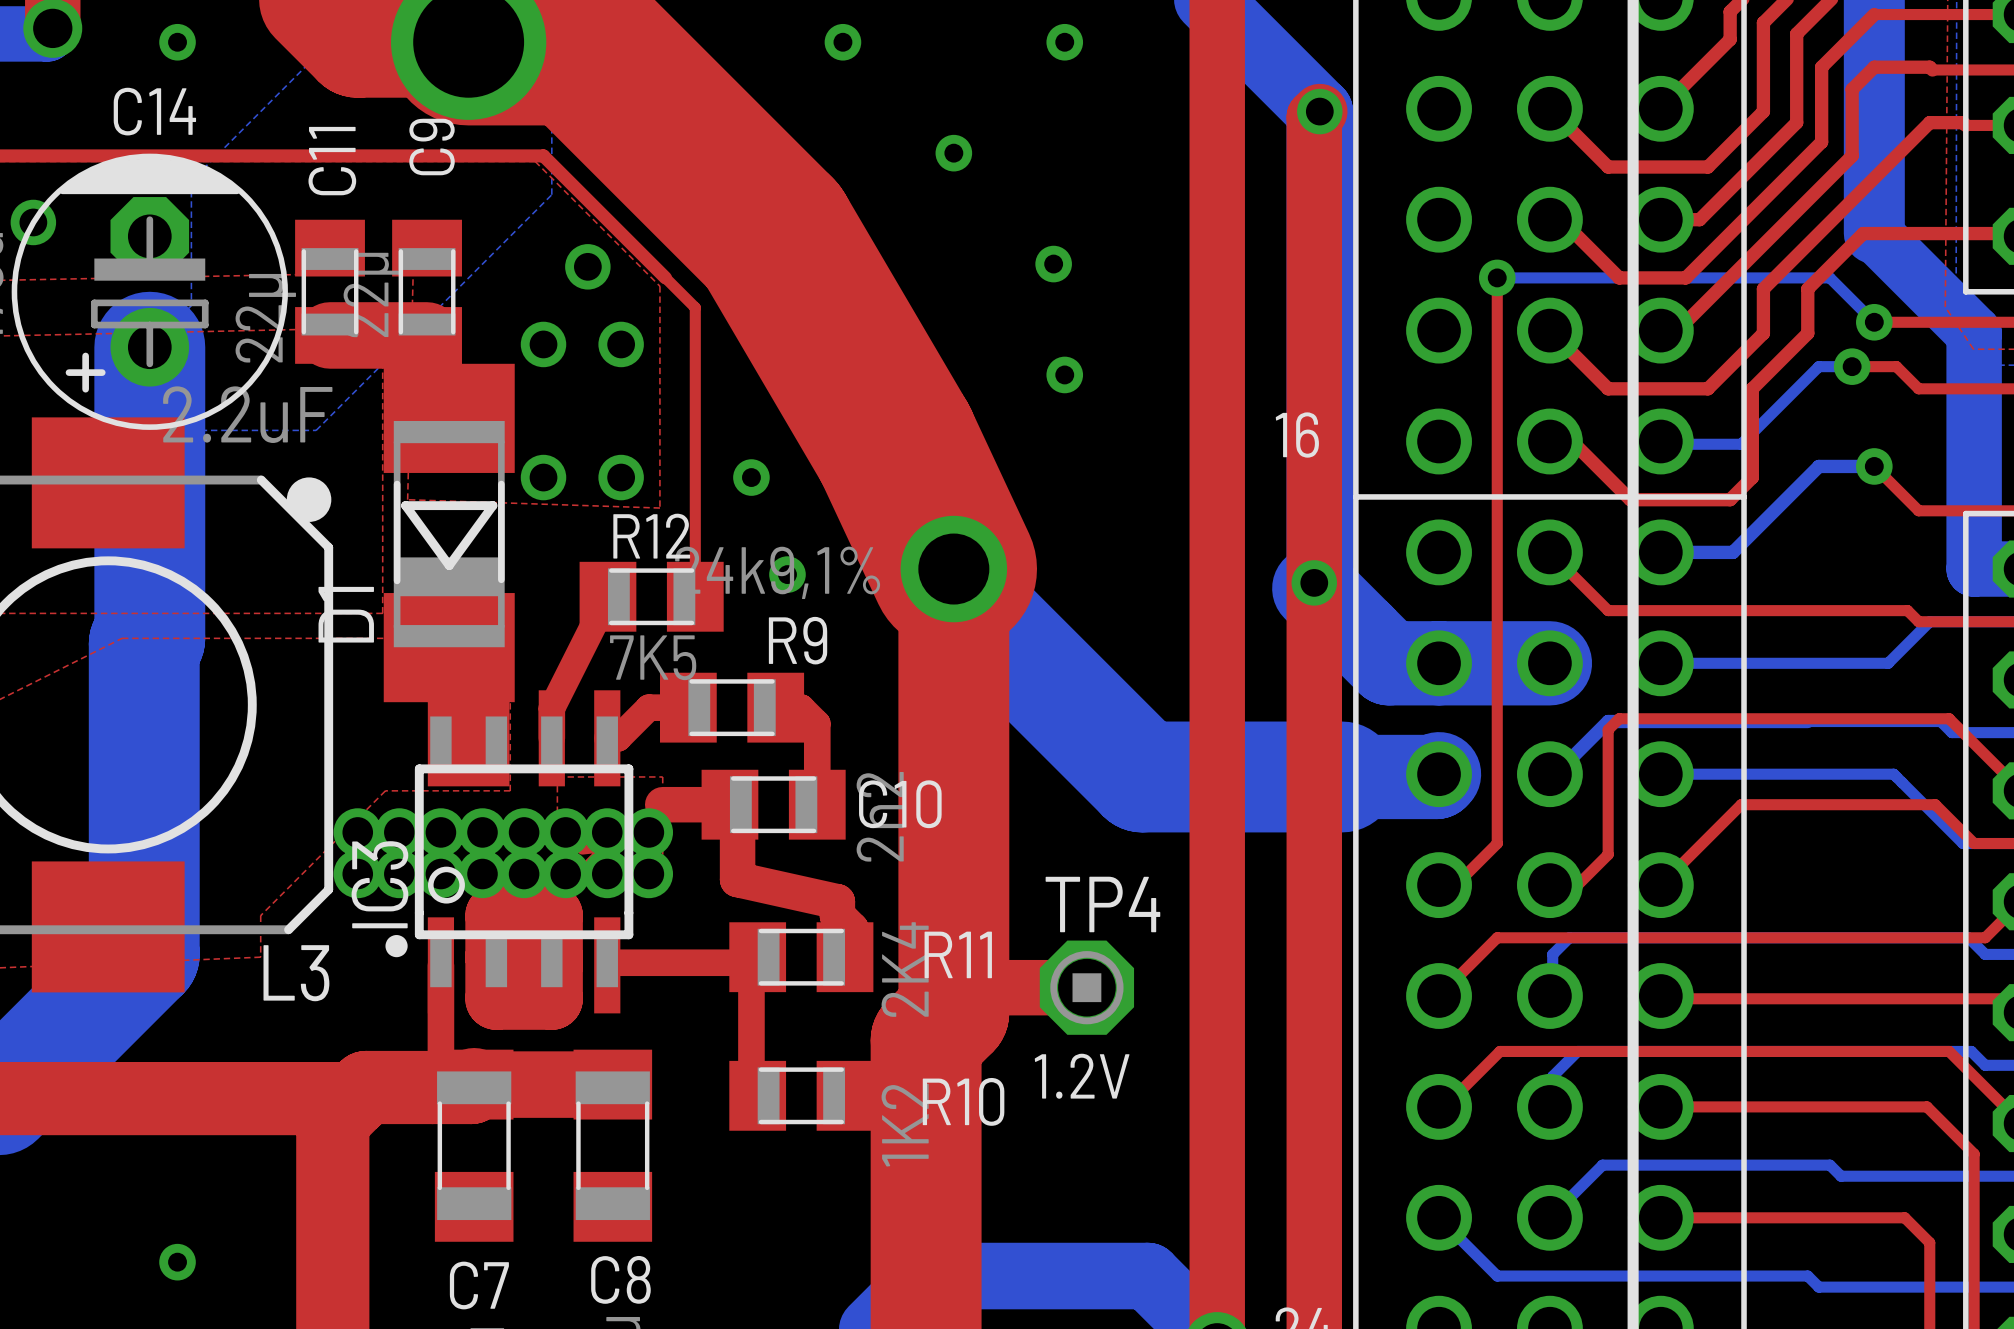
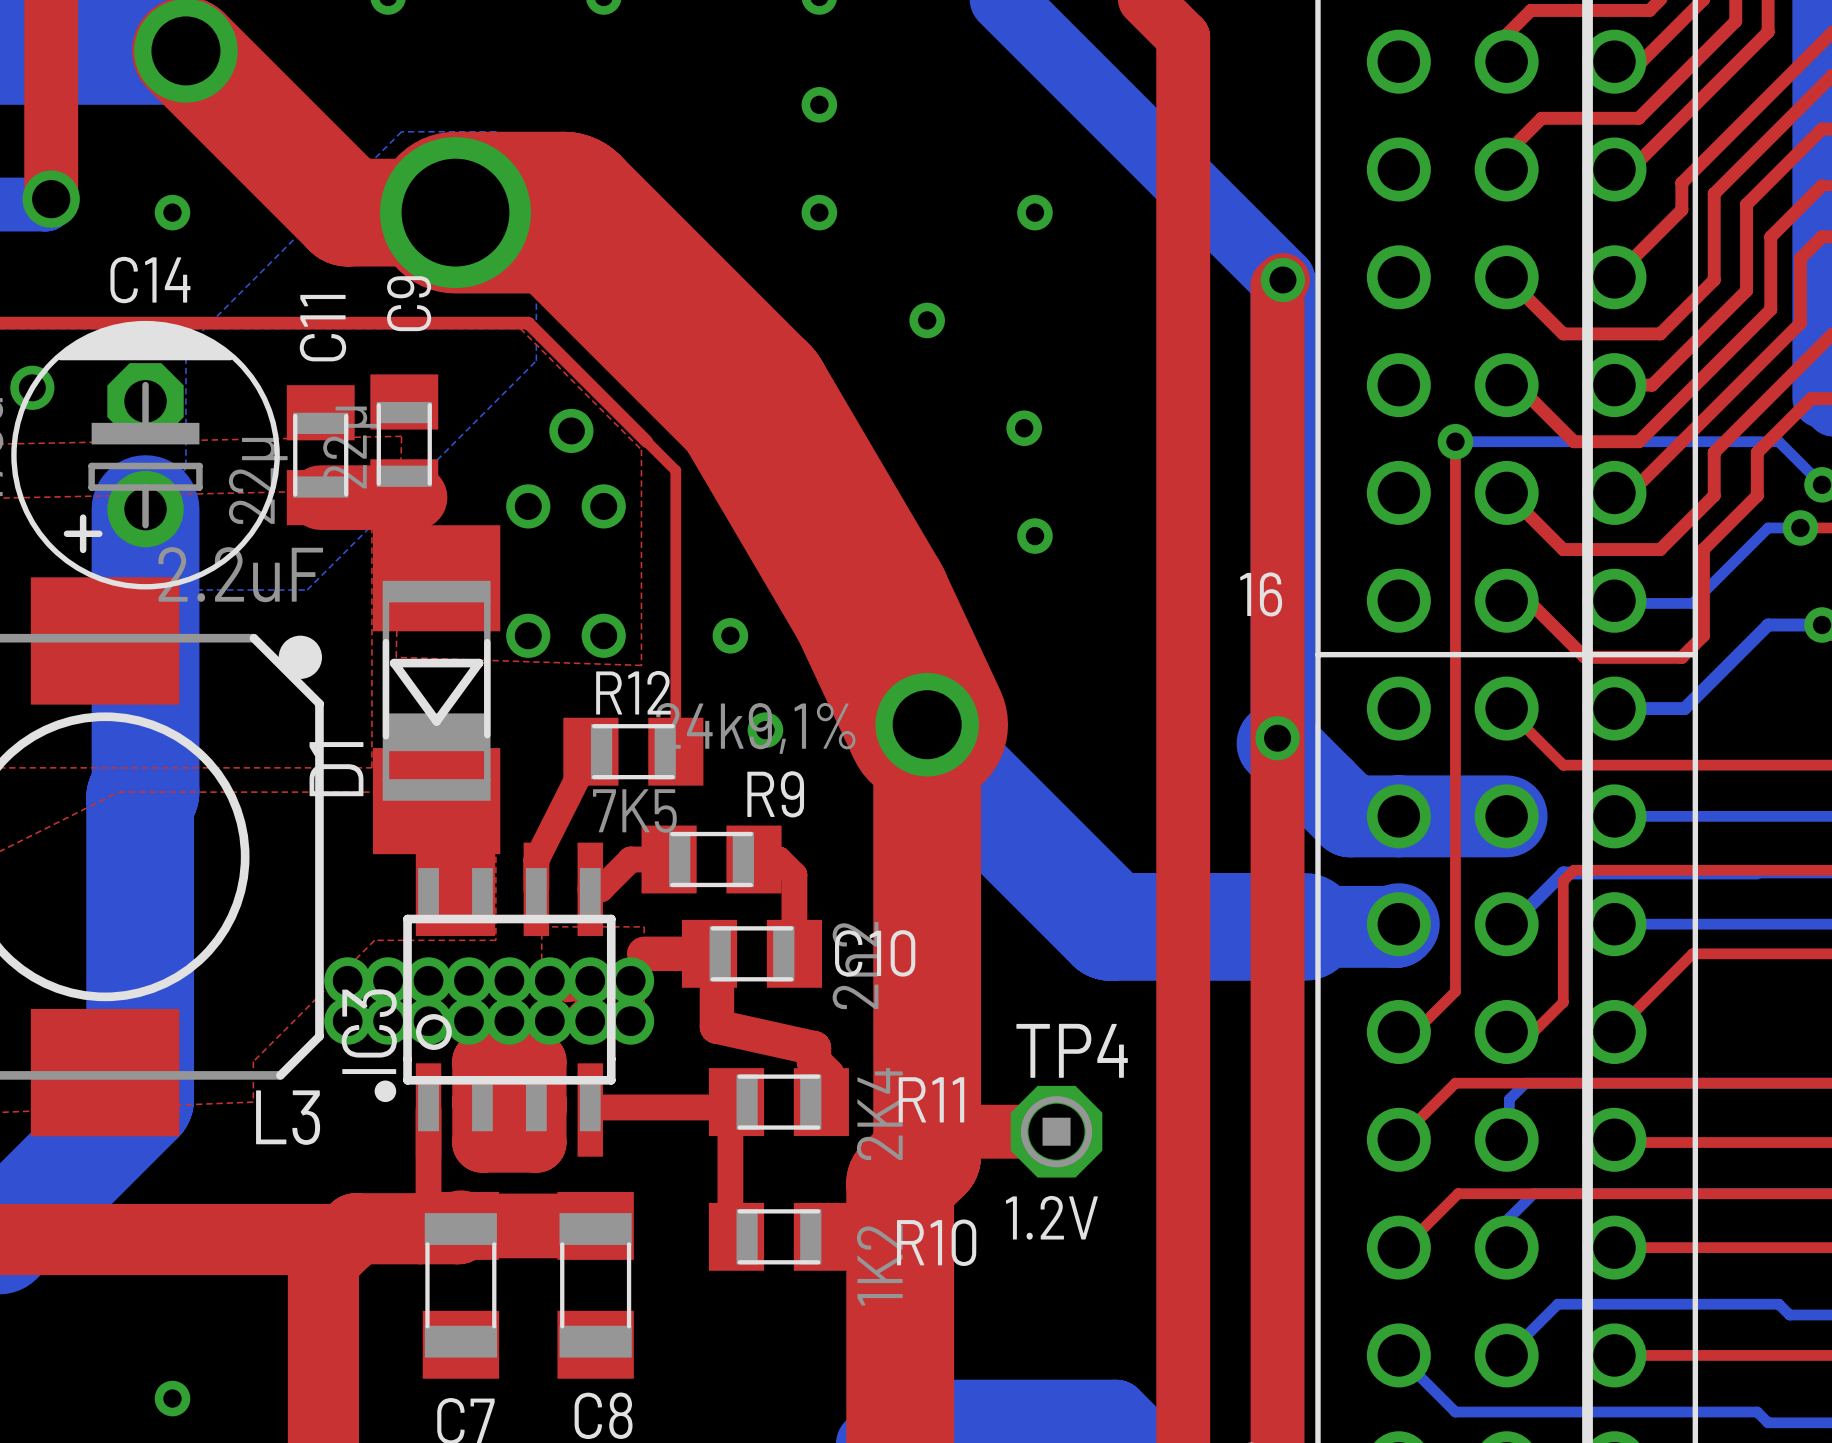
C9 position: (427, 291) -> (404, 444)

